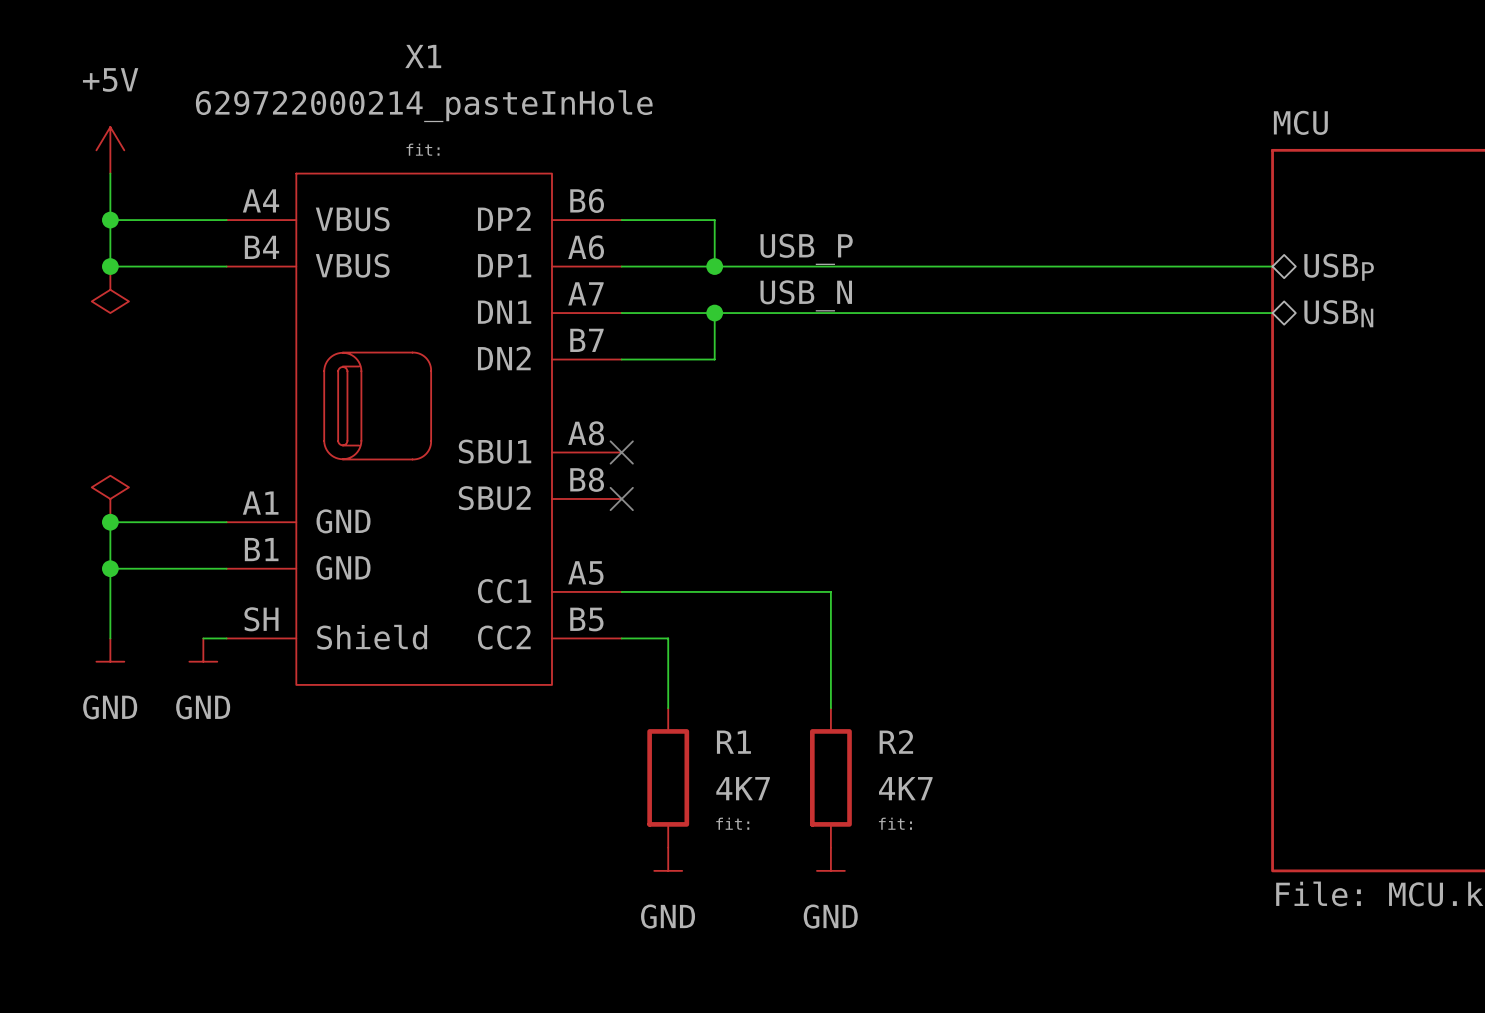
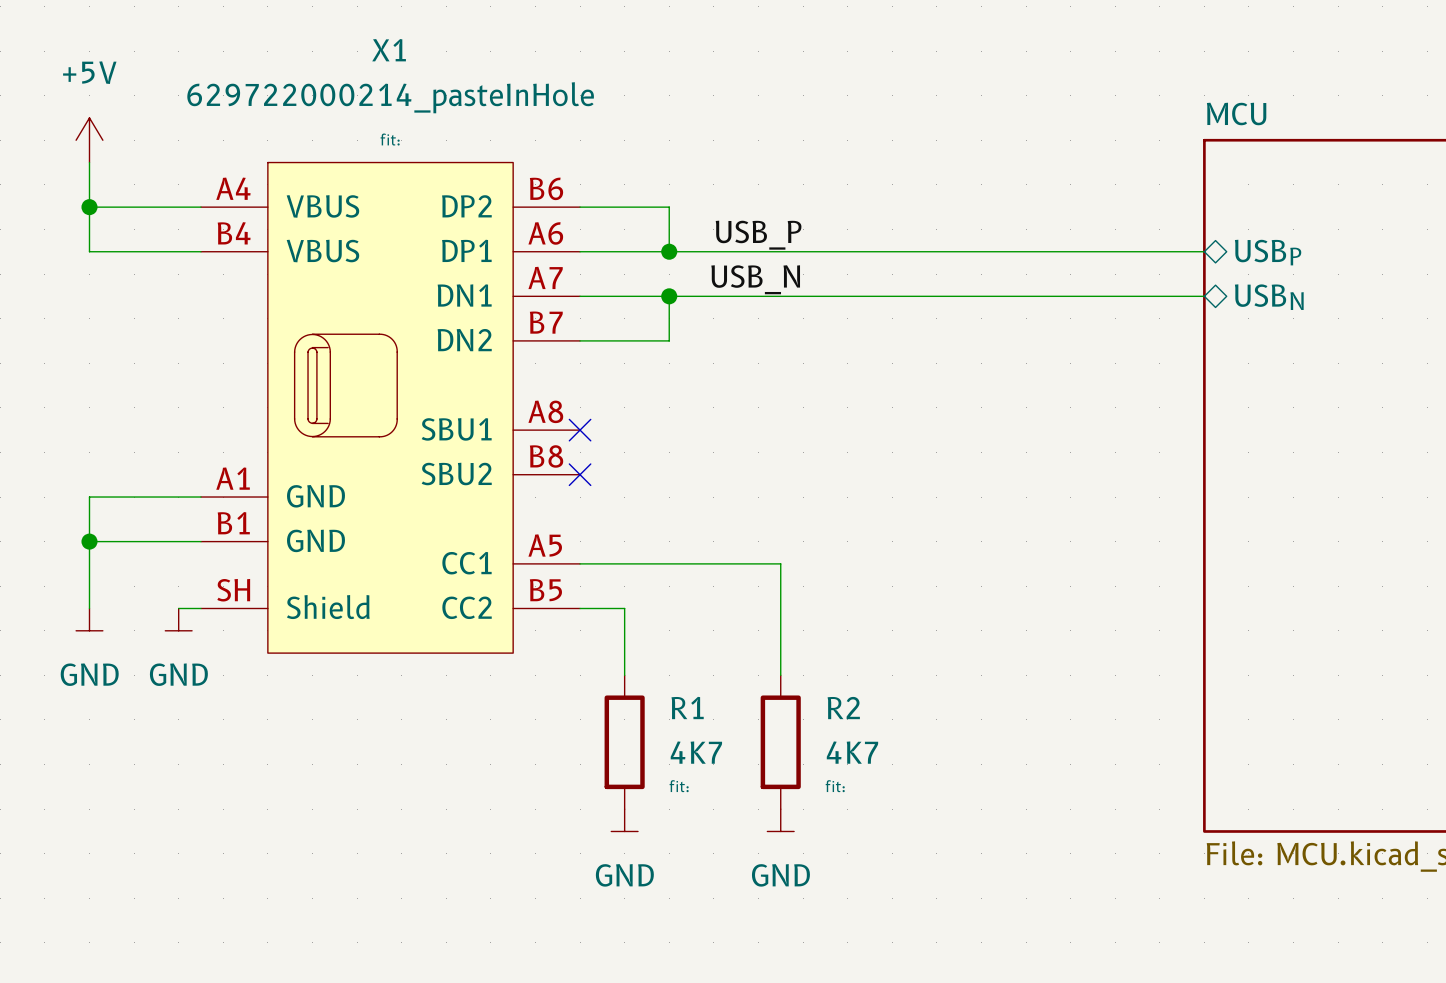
junction: (110, 266) -> none
power symbol: (110, 289) -> none
power symbol: (110, 498) -> none
junction: (110, 522) -> none

